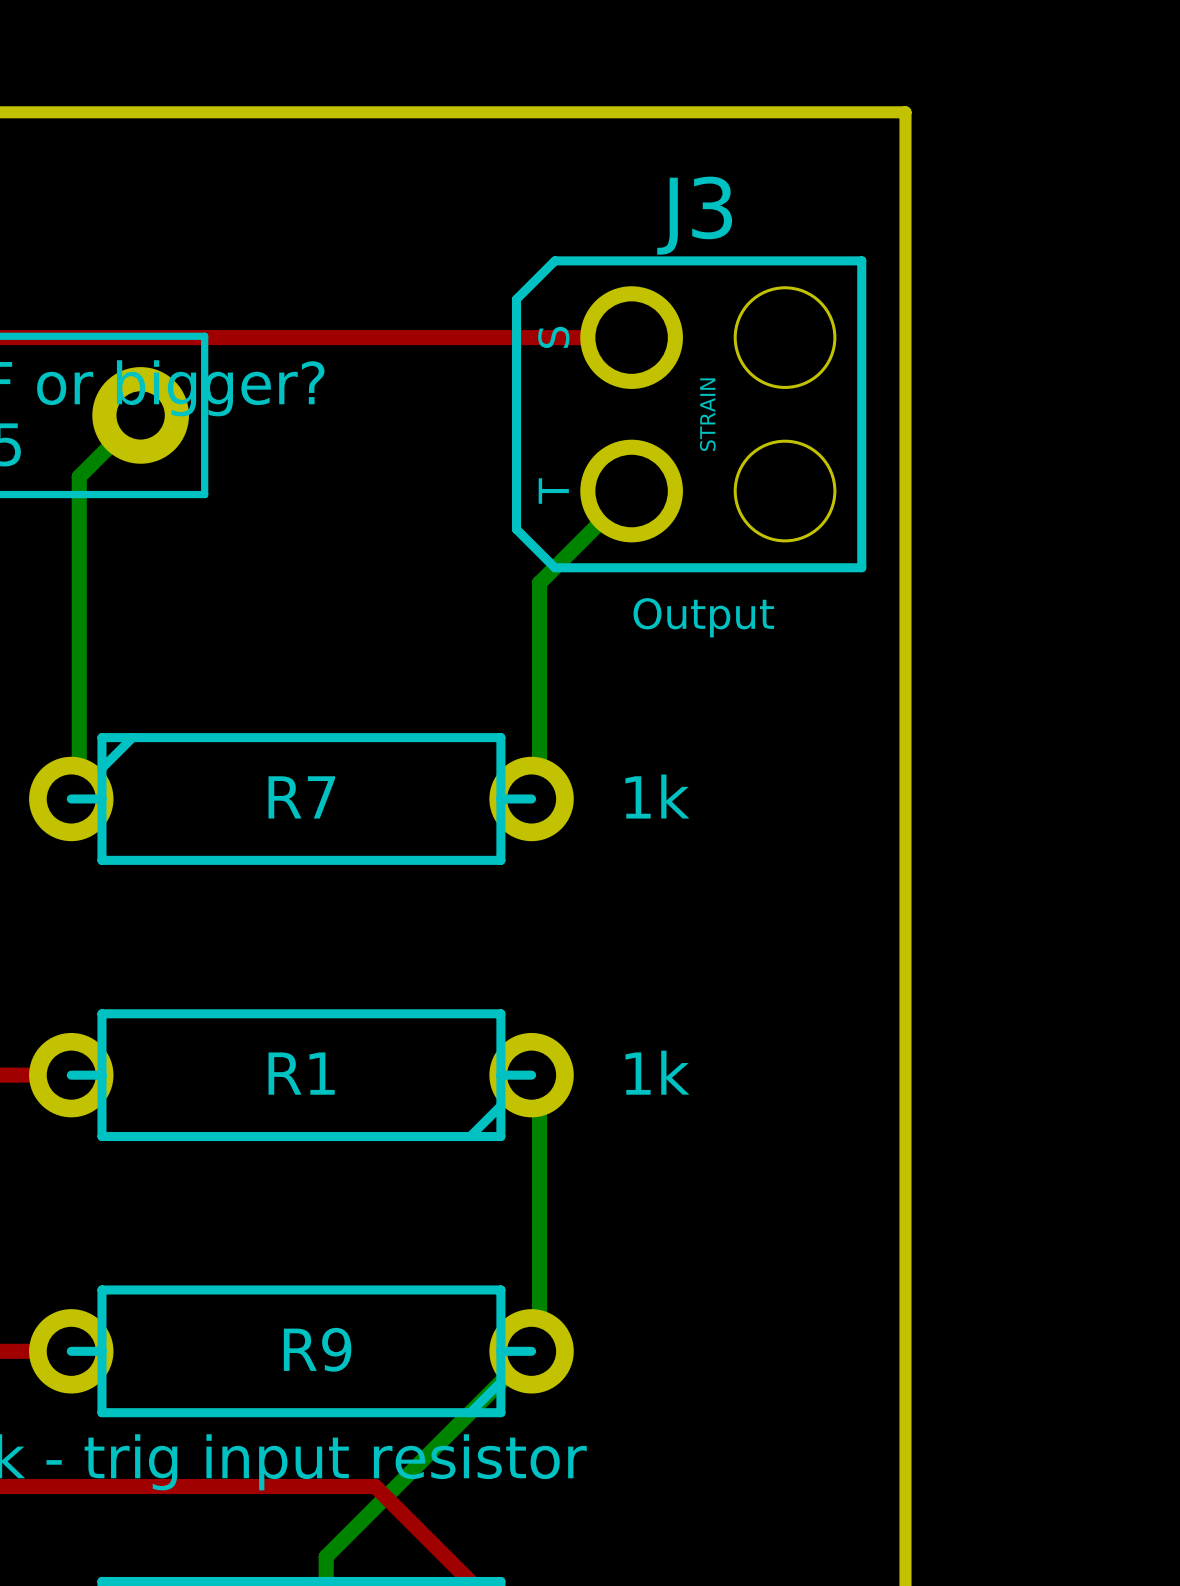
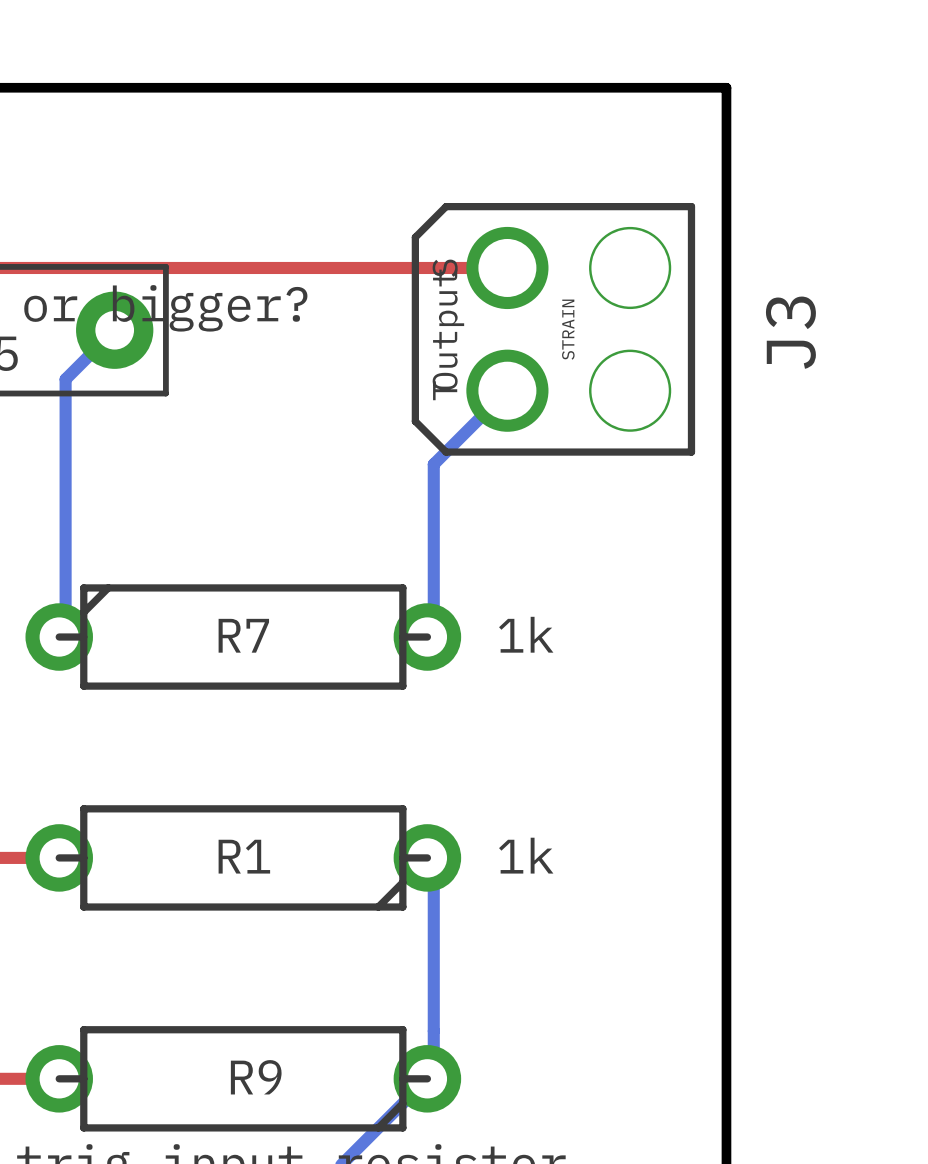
J3 name rotation: 0° (694, 215) -> 90° counterclockwise (790, 332)
J3 name position: J3 (694, 215) -> J3 (790, 332)
J3 value rotation: 0° (703, 617) -> 90° counterclockwise (448, 329)
J3 value position: Output (703, 617) -> Output (448, 329)

